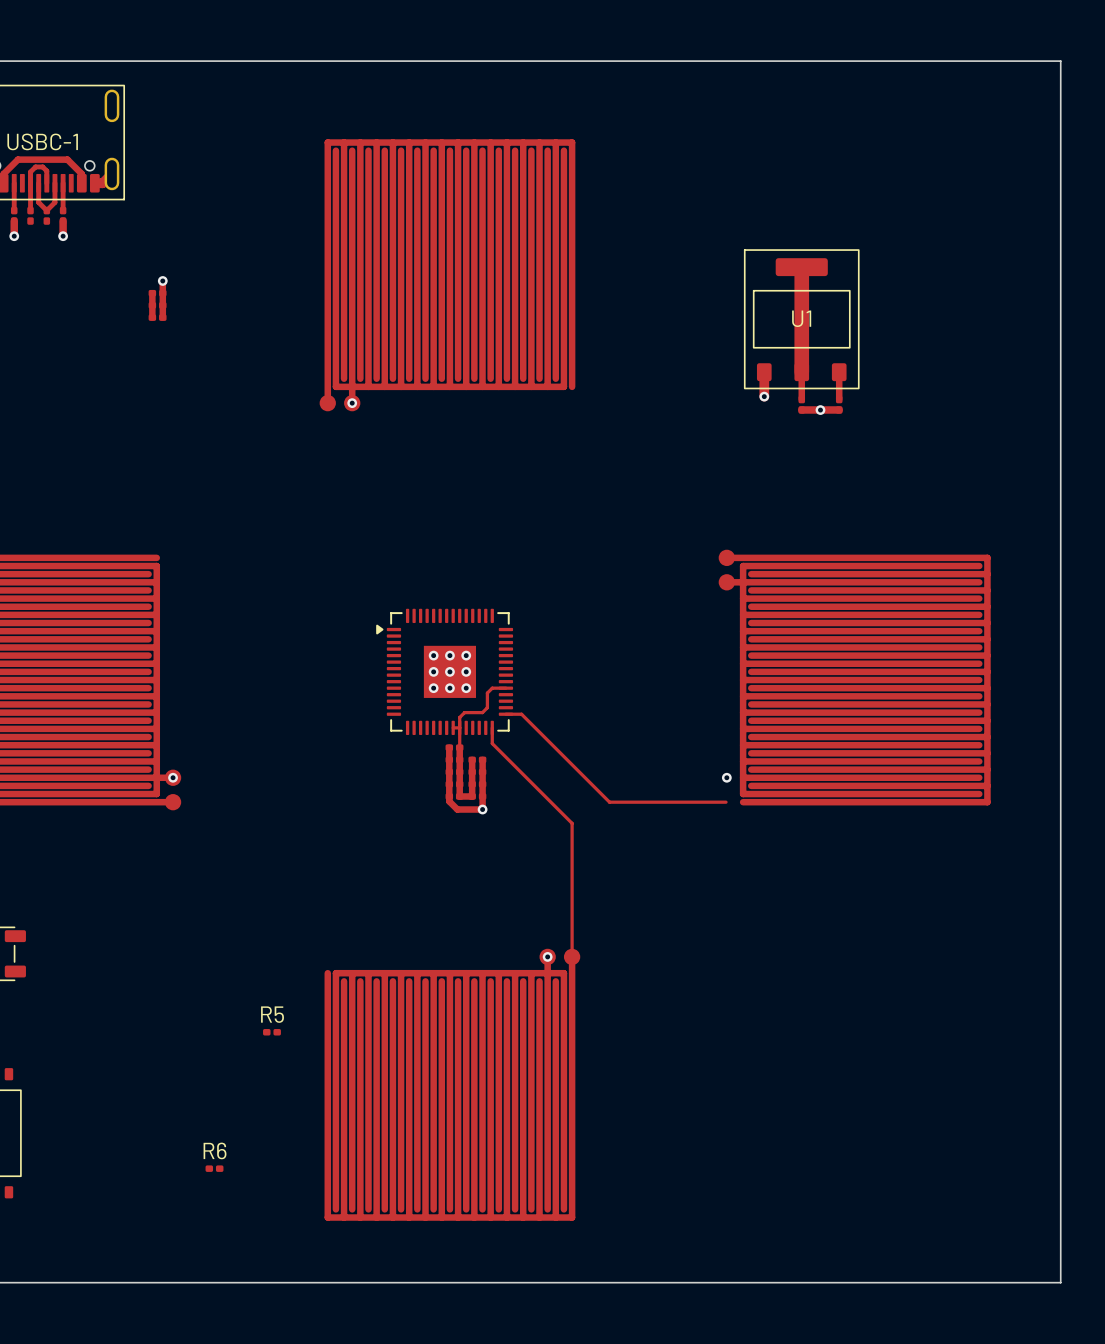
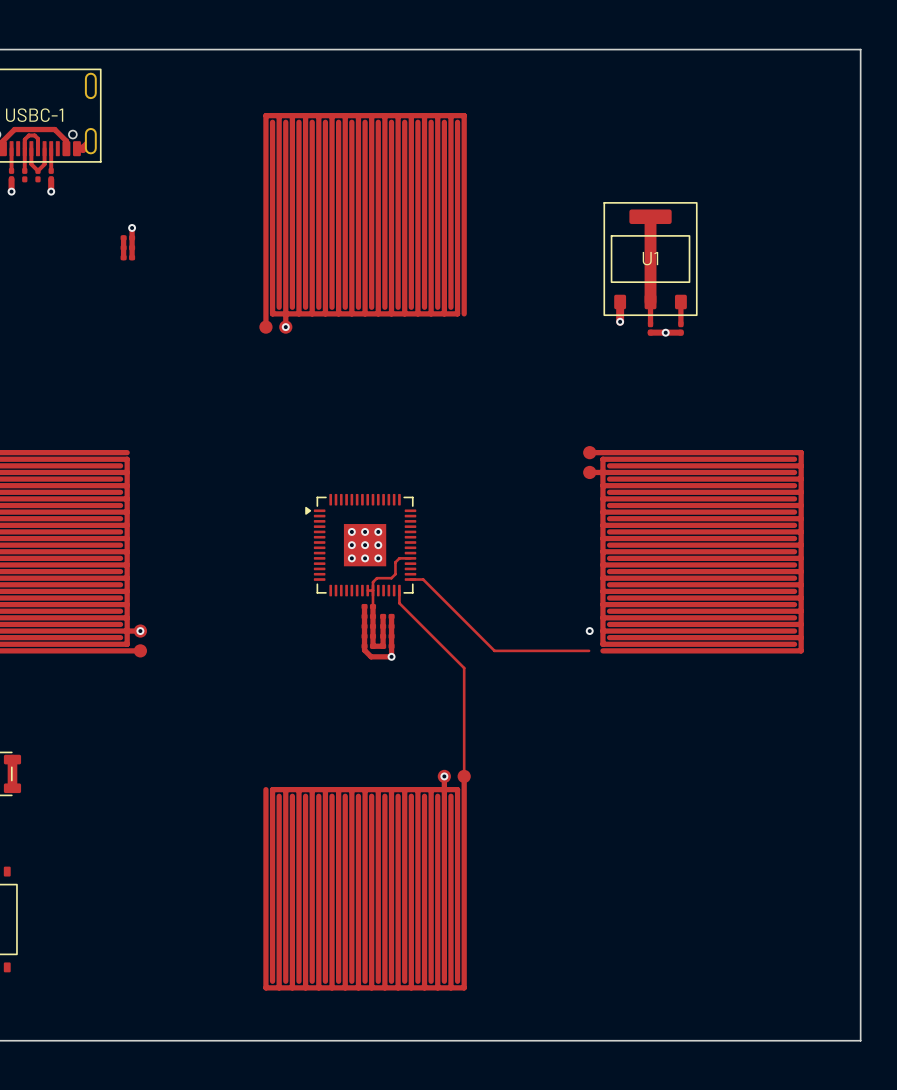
track: none -> (12, 759) (12, 788)
R5: (271, 1032) -> none
R6: (214, 1168) -> none

